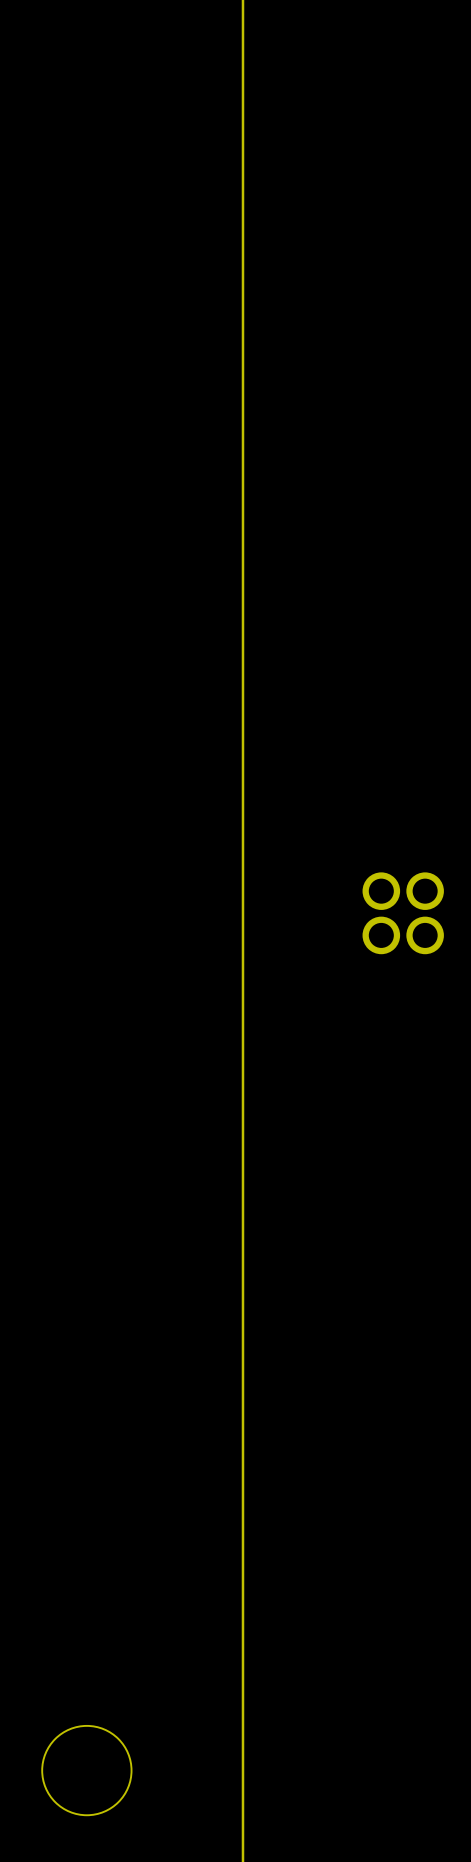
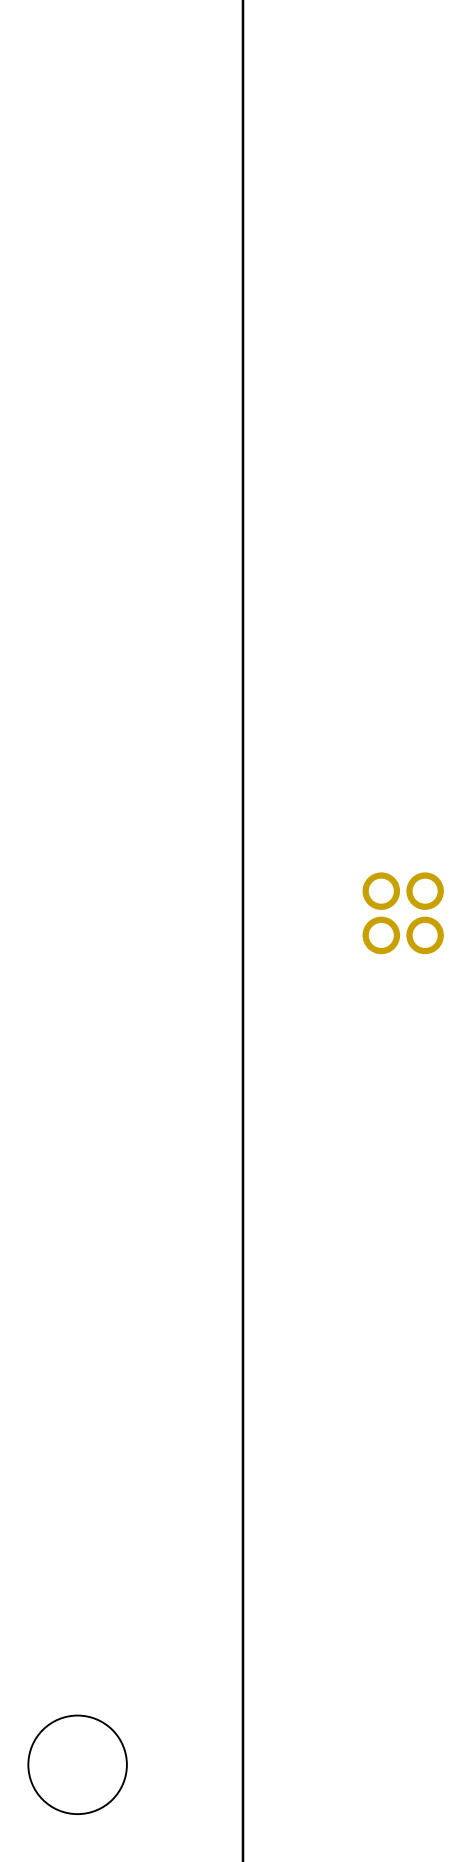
round board edge size: [41, 1724, 133, 1817] -> [27, 1714, 128, 1816]

